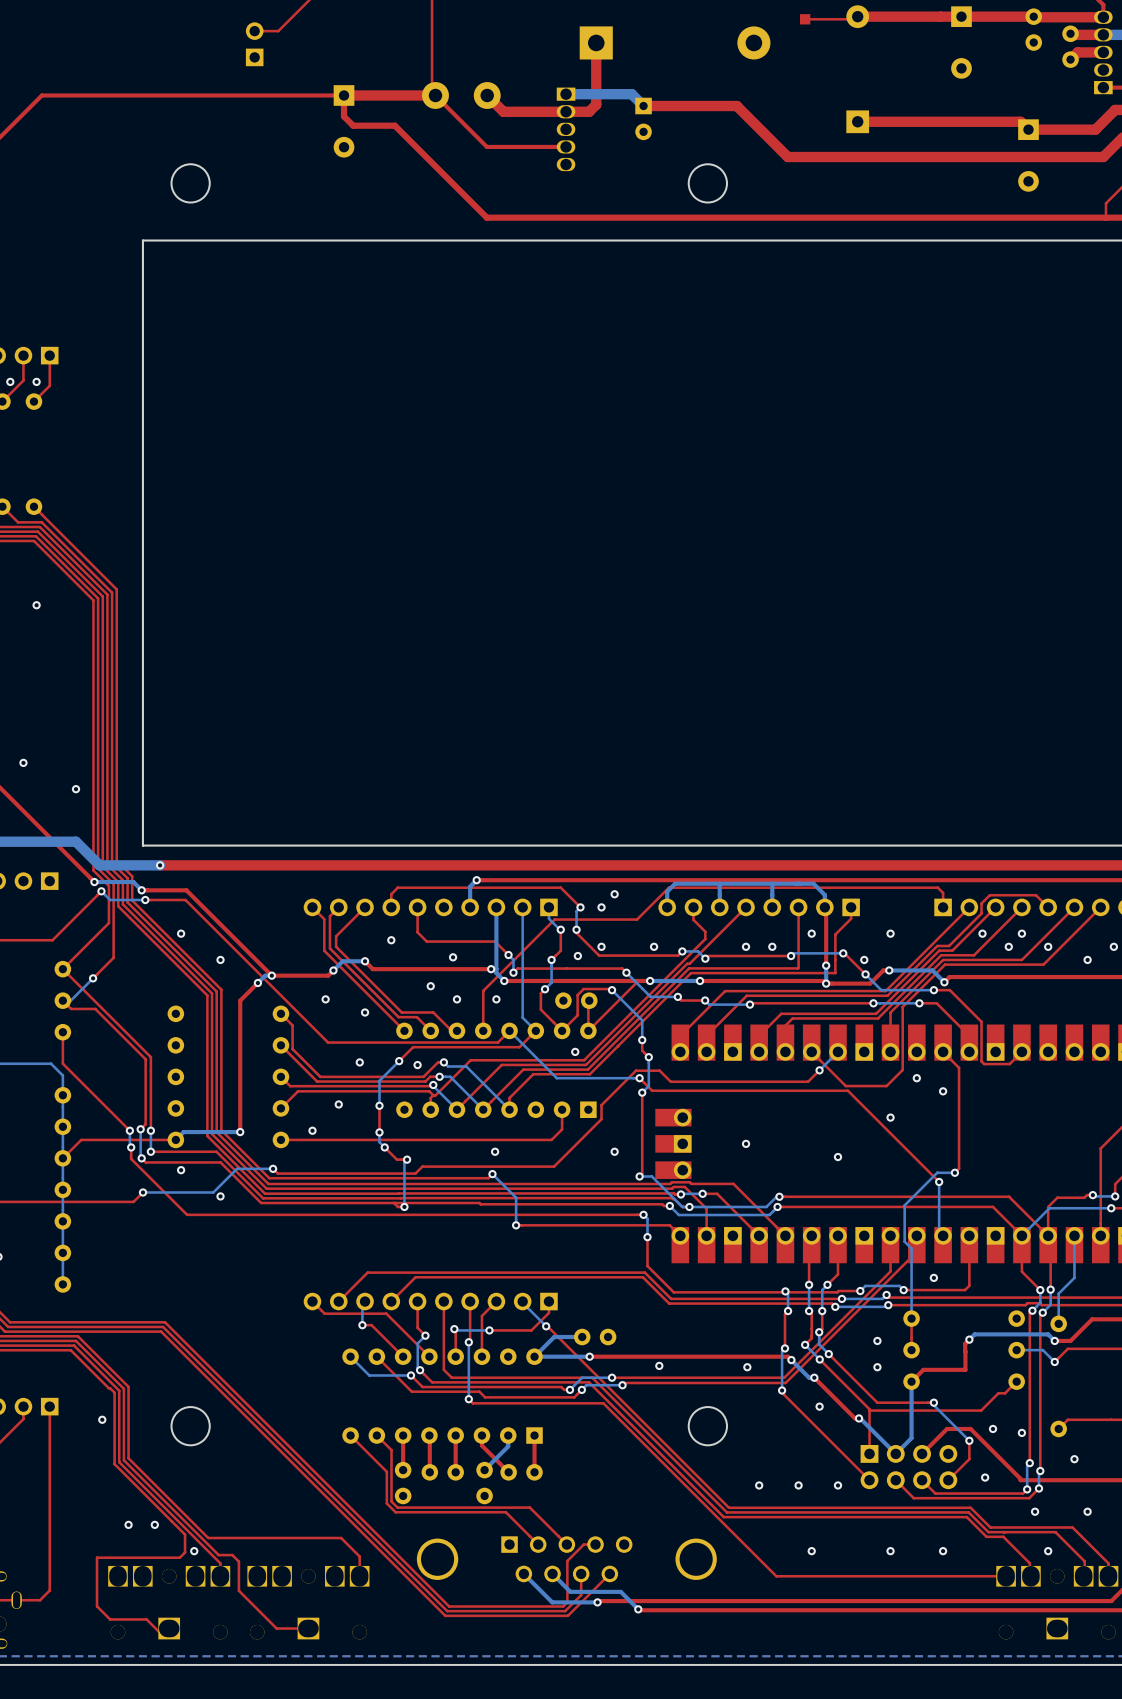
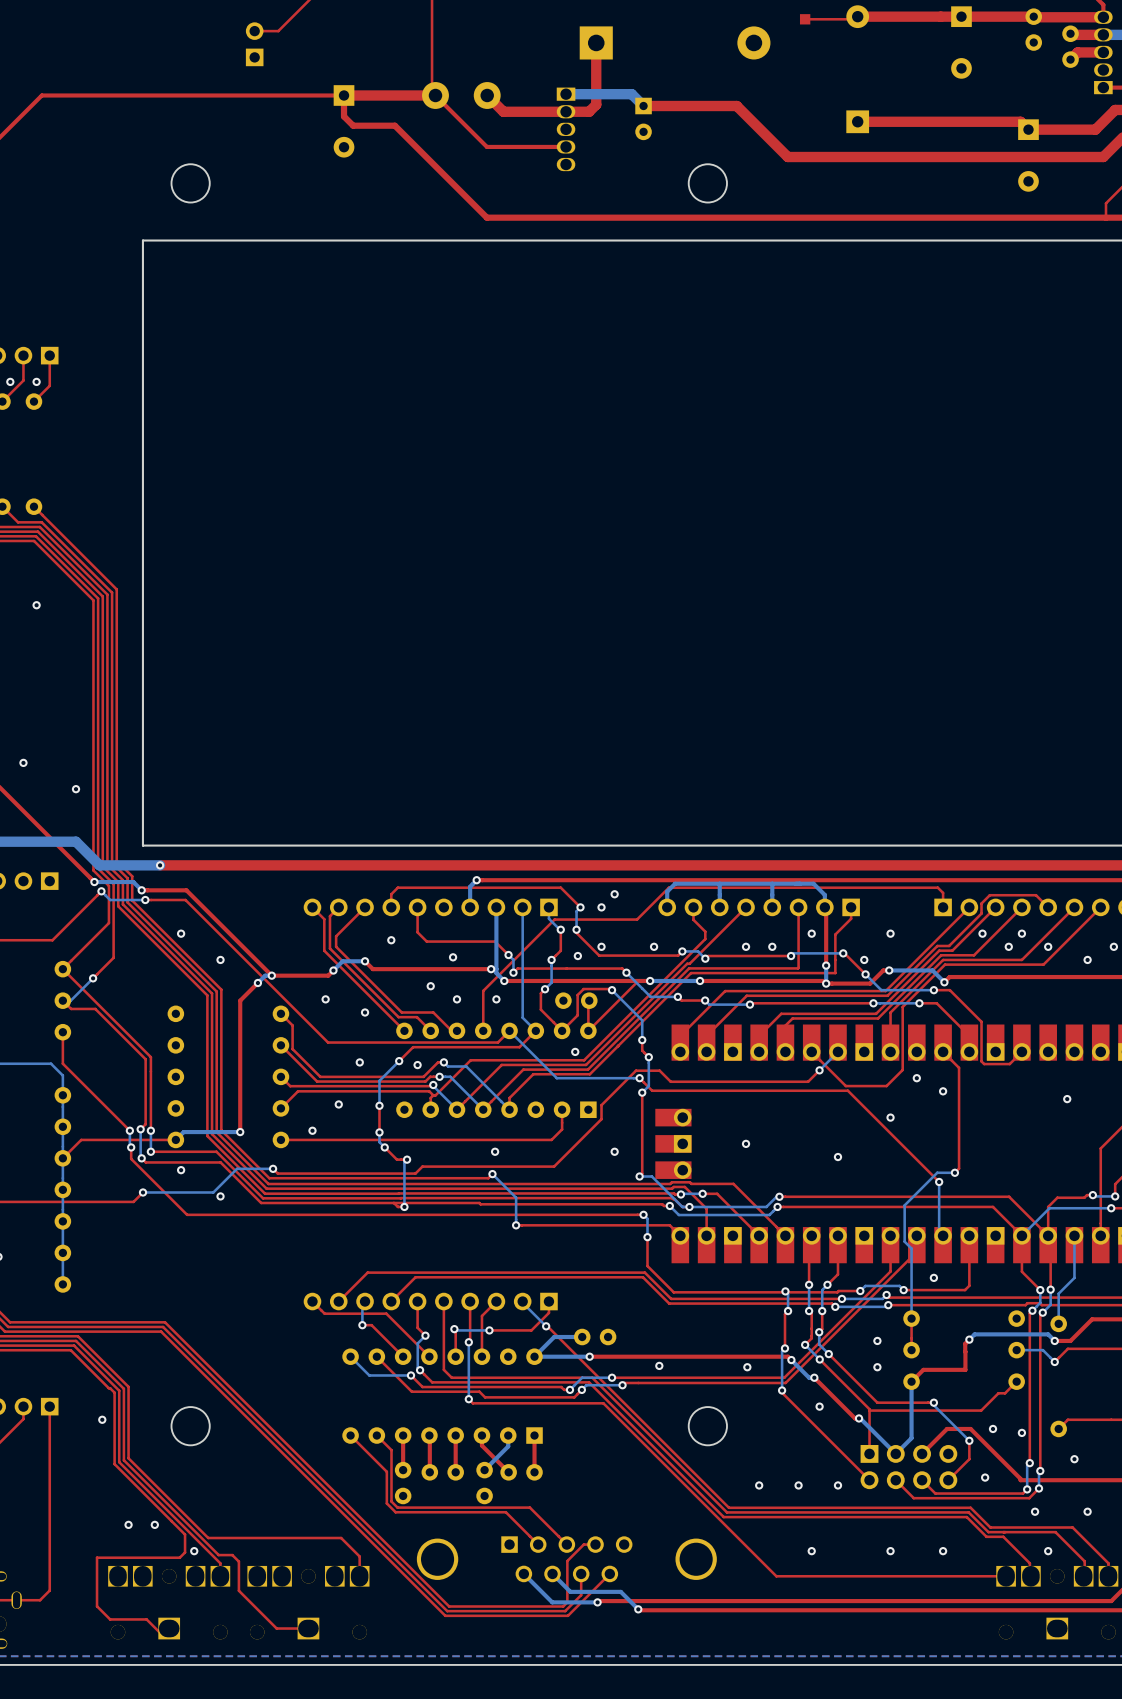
via: none -> (1067, 1099)

